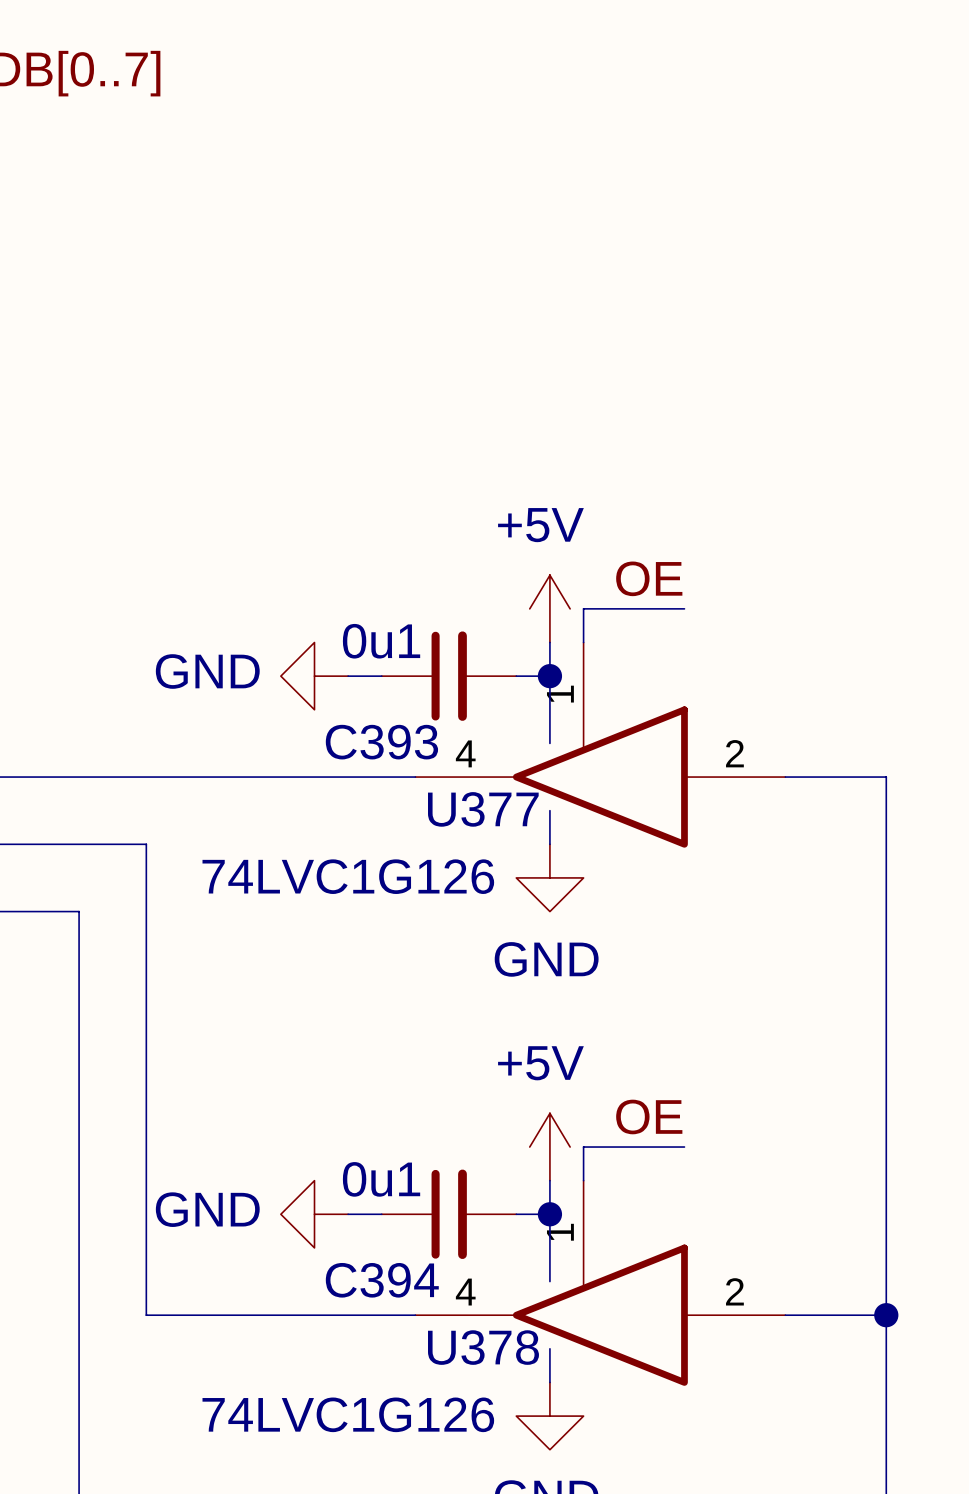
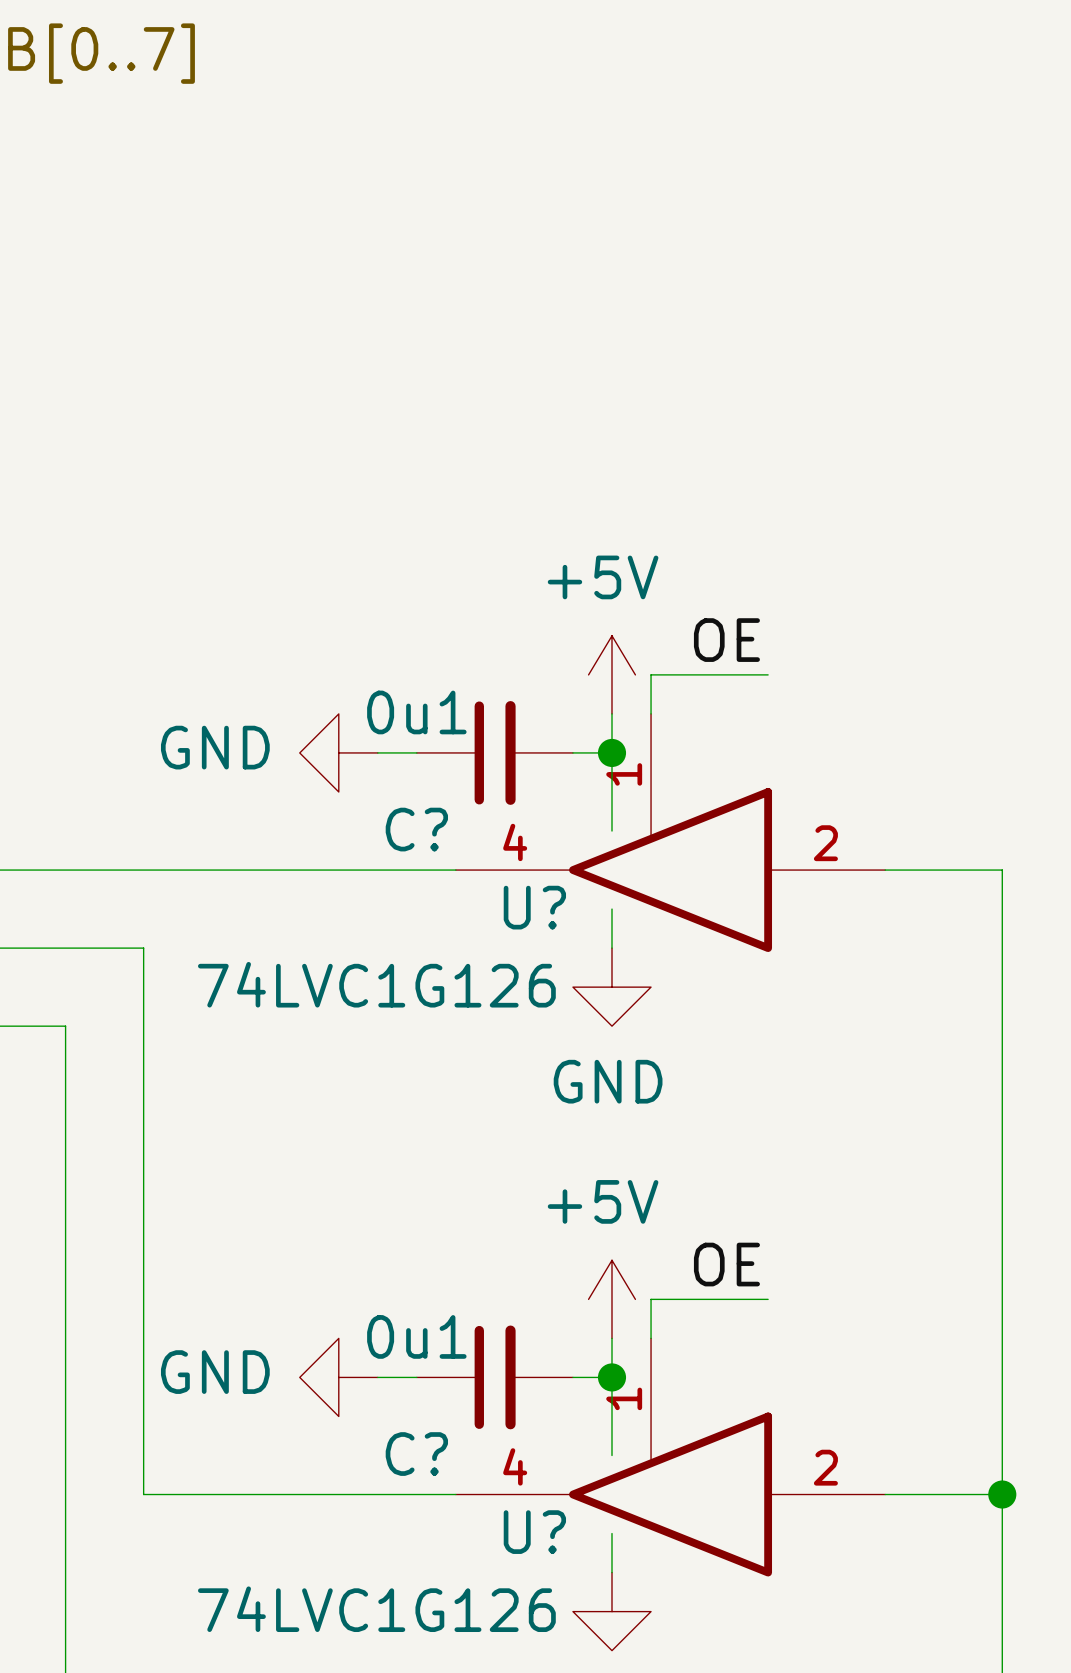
C393 name: C393 (381, 742) -> C? (416, 829)
U377 name: U377 (483, 809) -> U? (534, 907)
C394 name: C394 (382, 1280) -> C? (416, 1454)
U378 name: U378 (483, 1347) -> U? (534, 1532)

